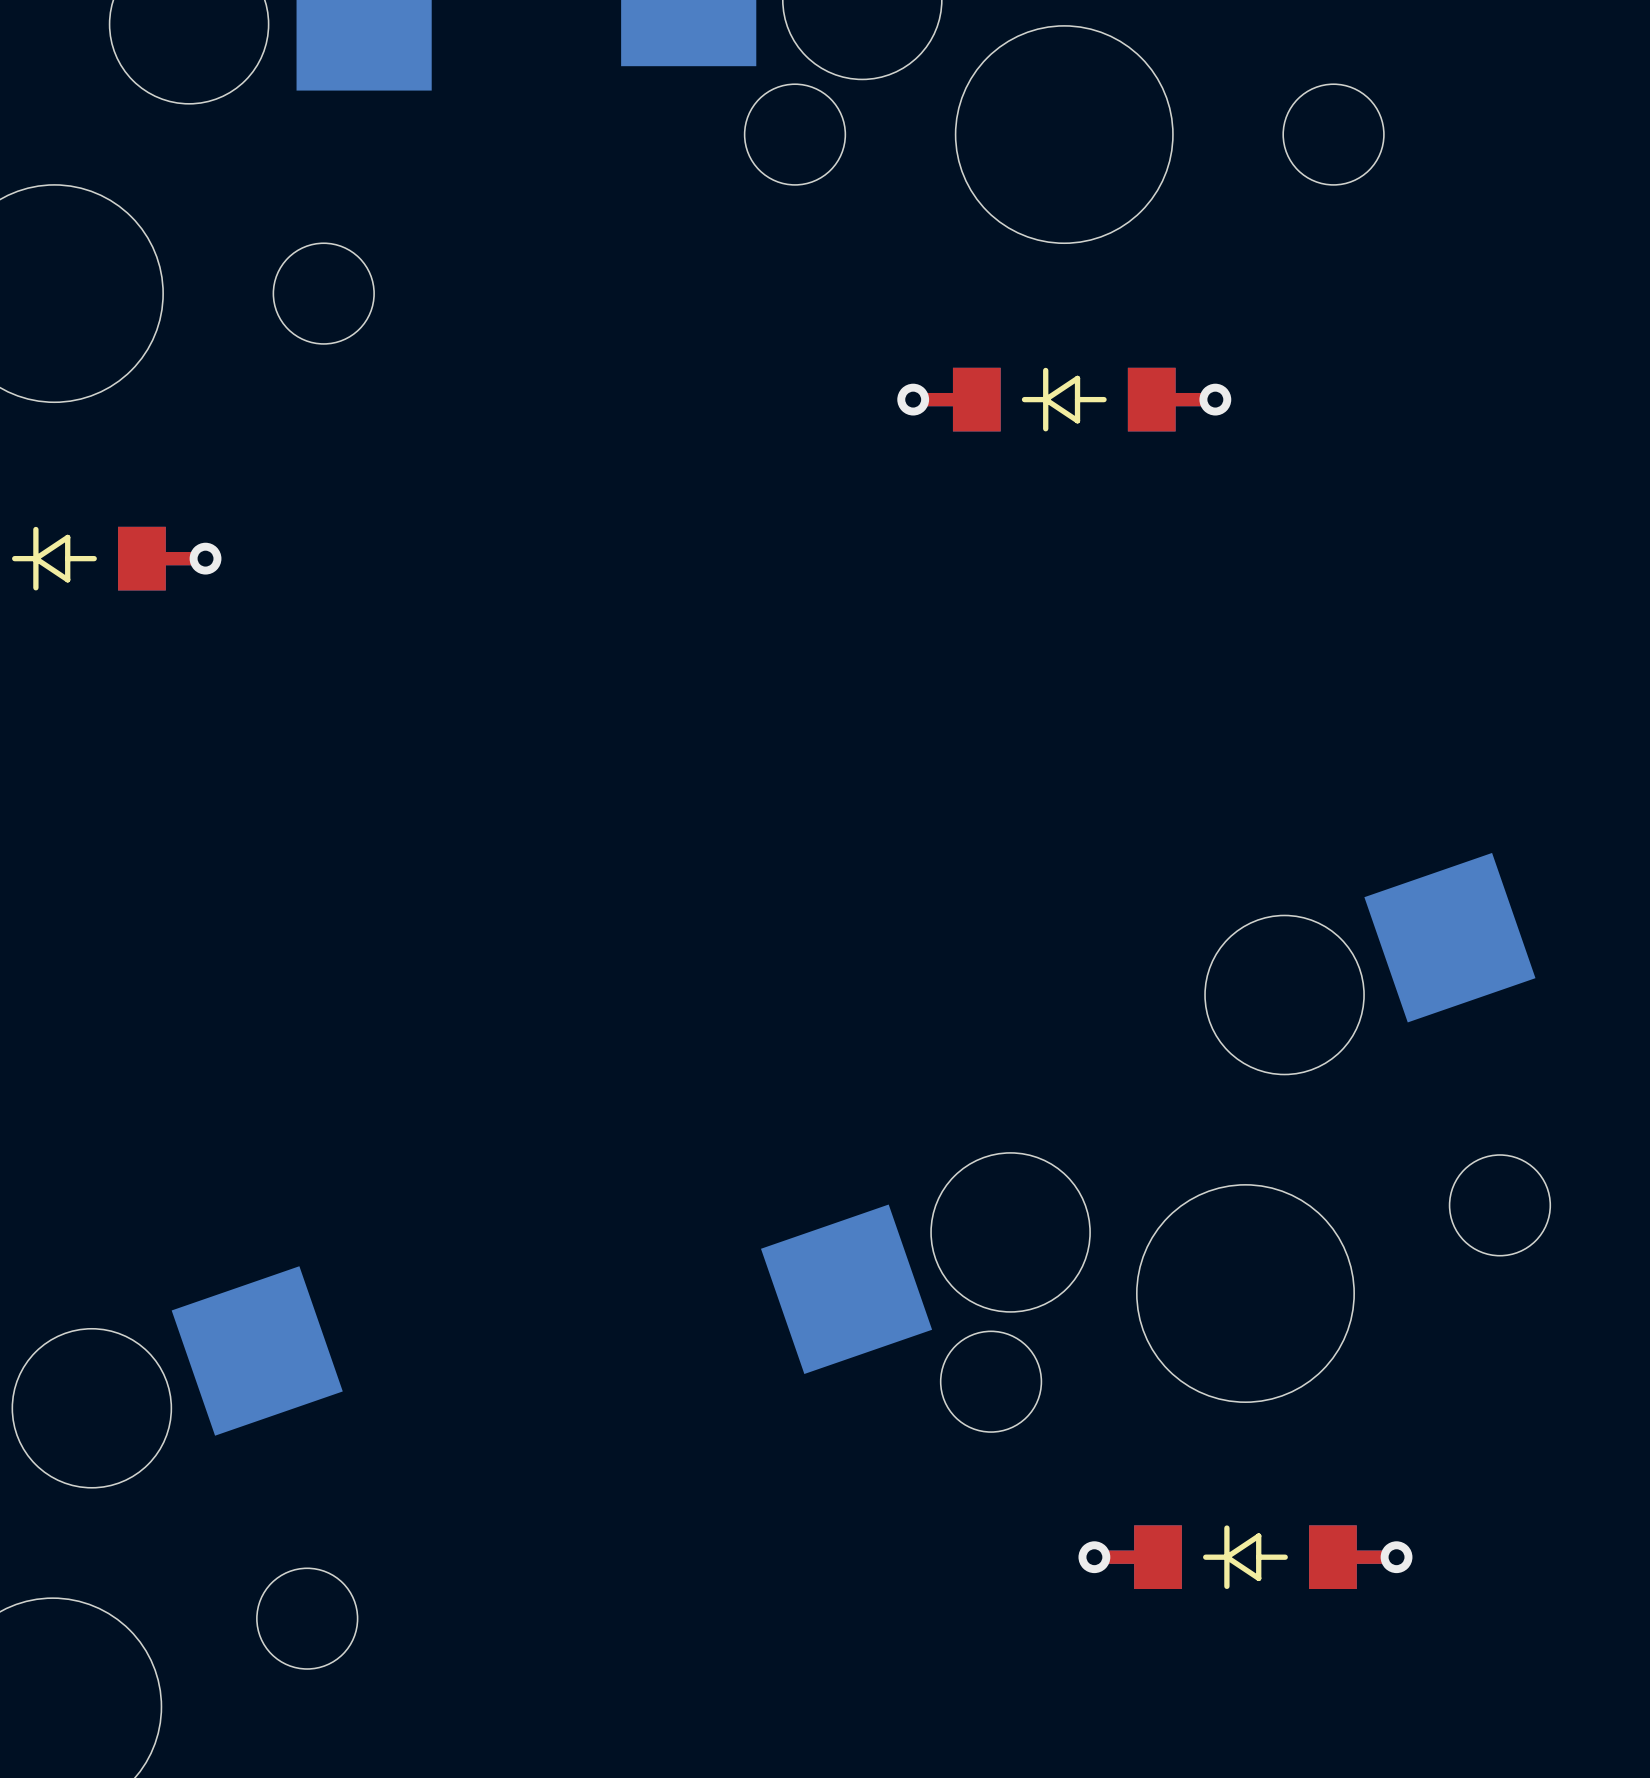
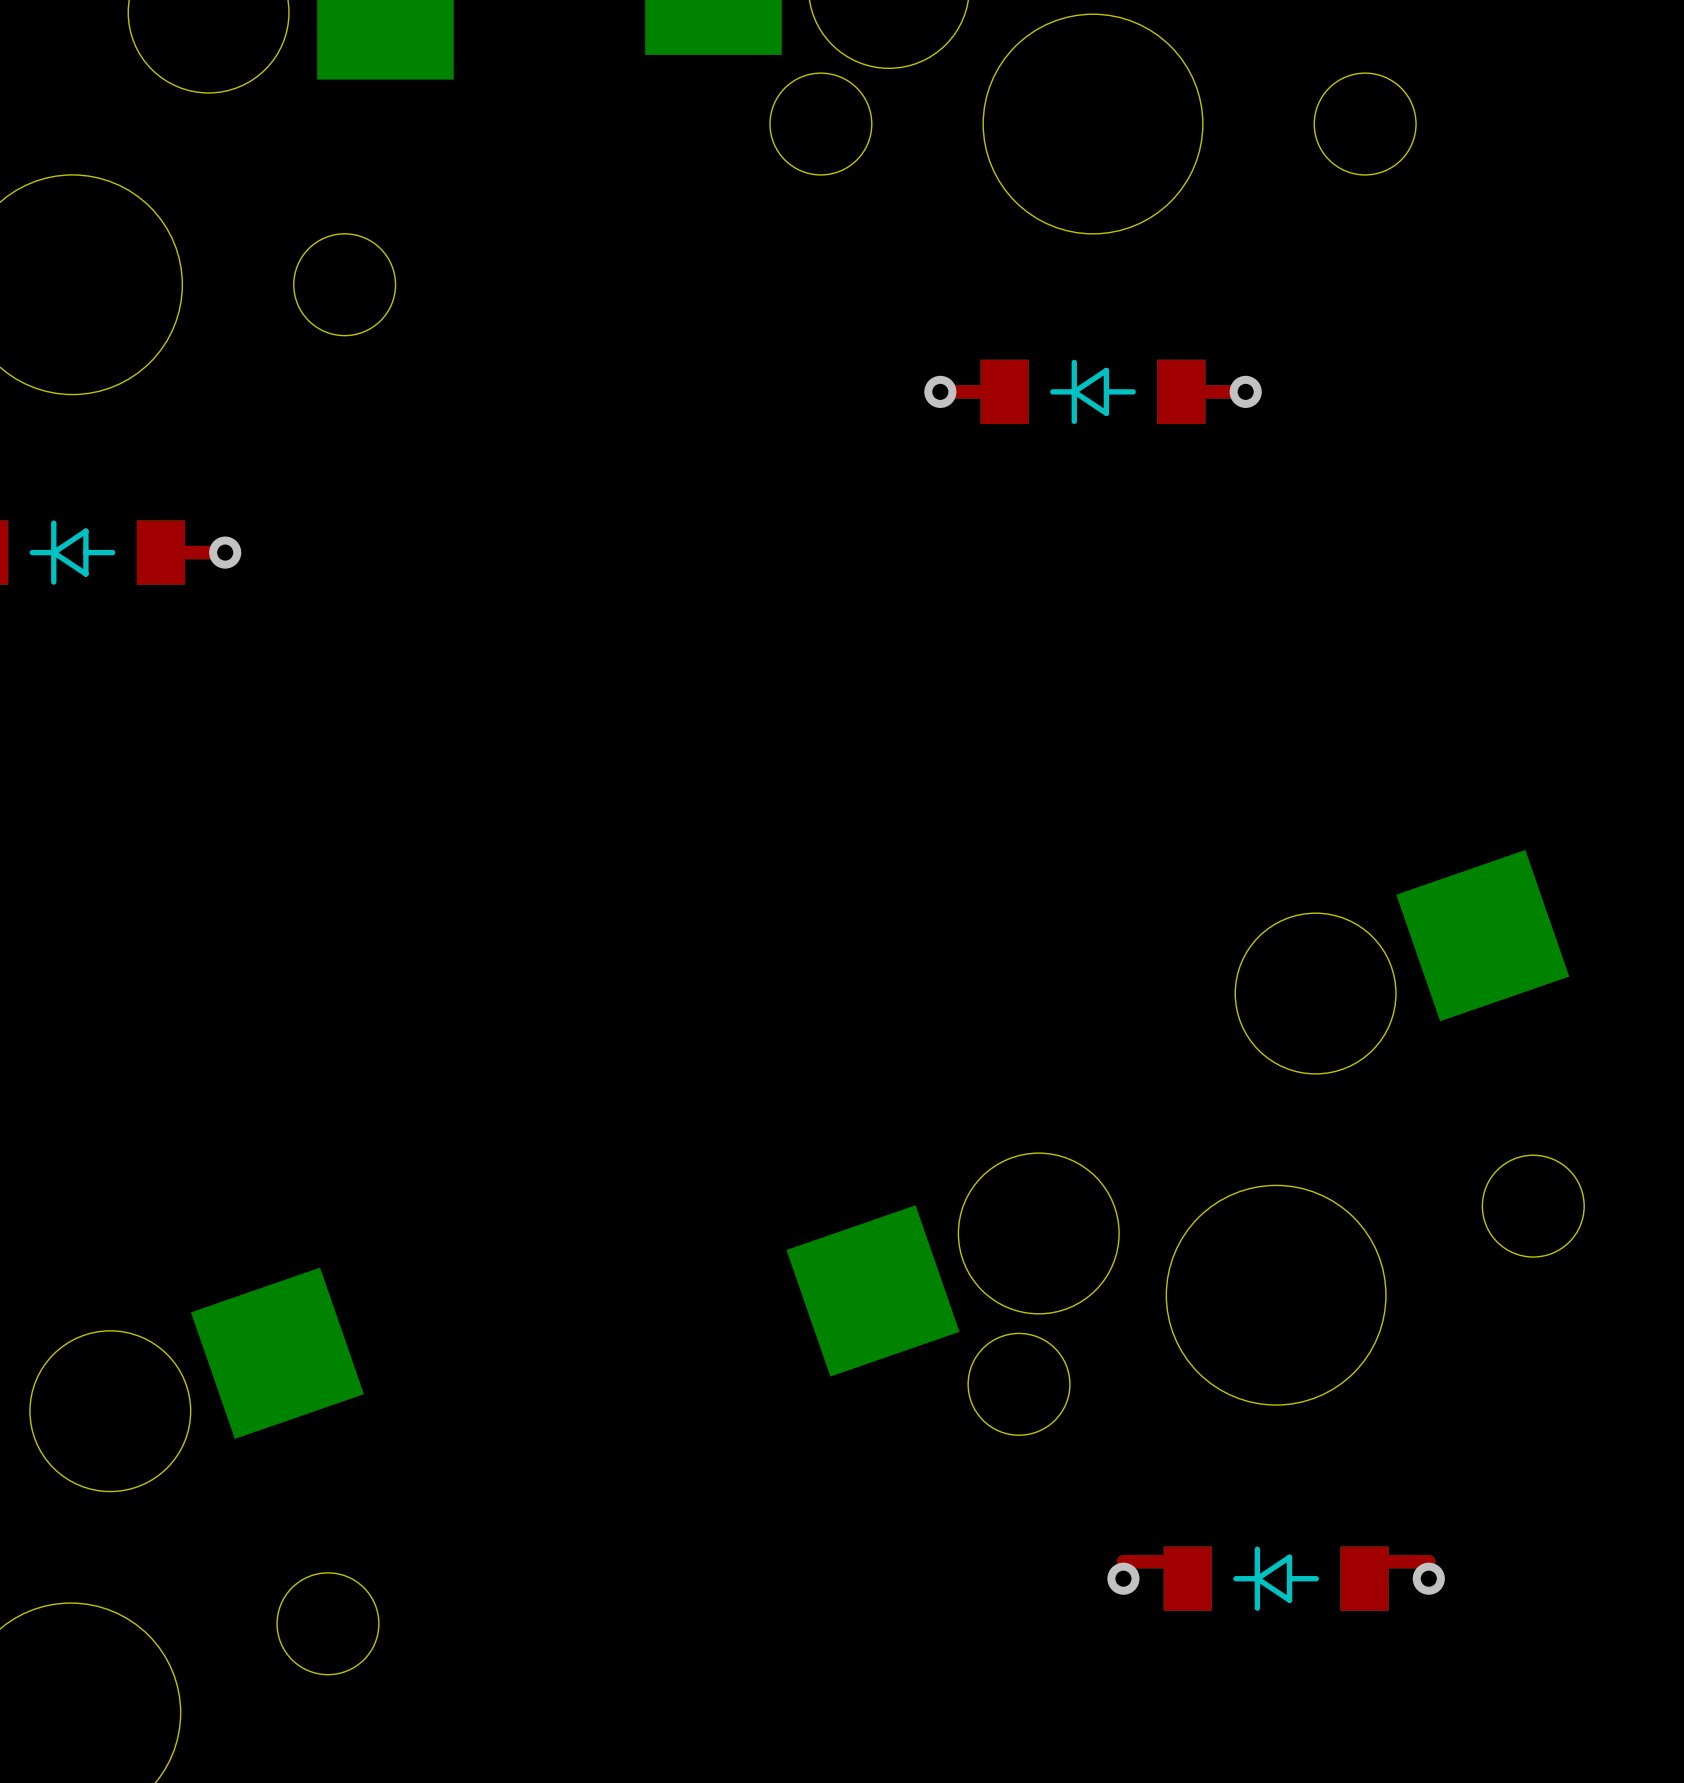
via position: (1094, 1557) -> (1123, 1578)
part position: (1245, 1557) -> (1276, 1578)
via position: (1396, 1557) -> (1428, 1578)

